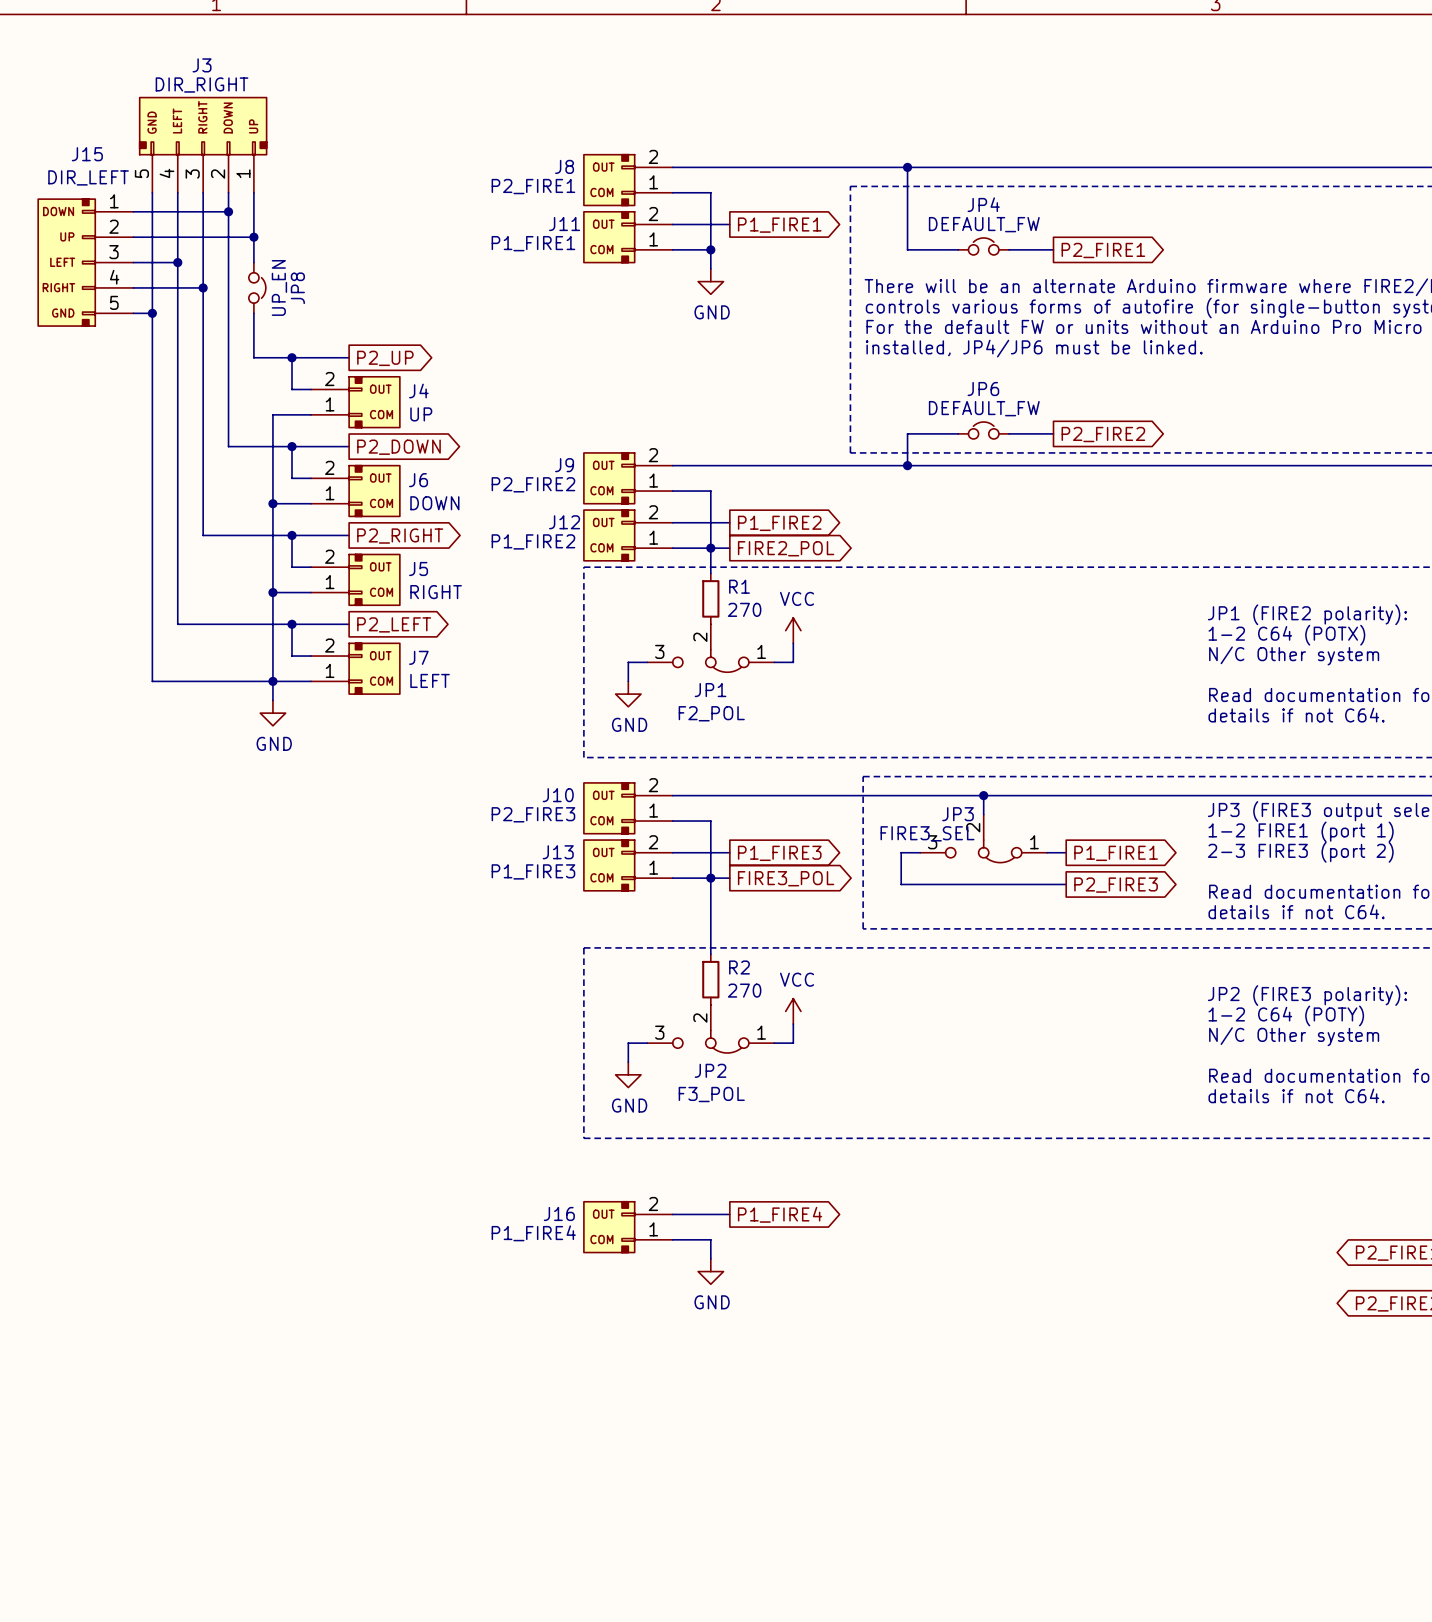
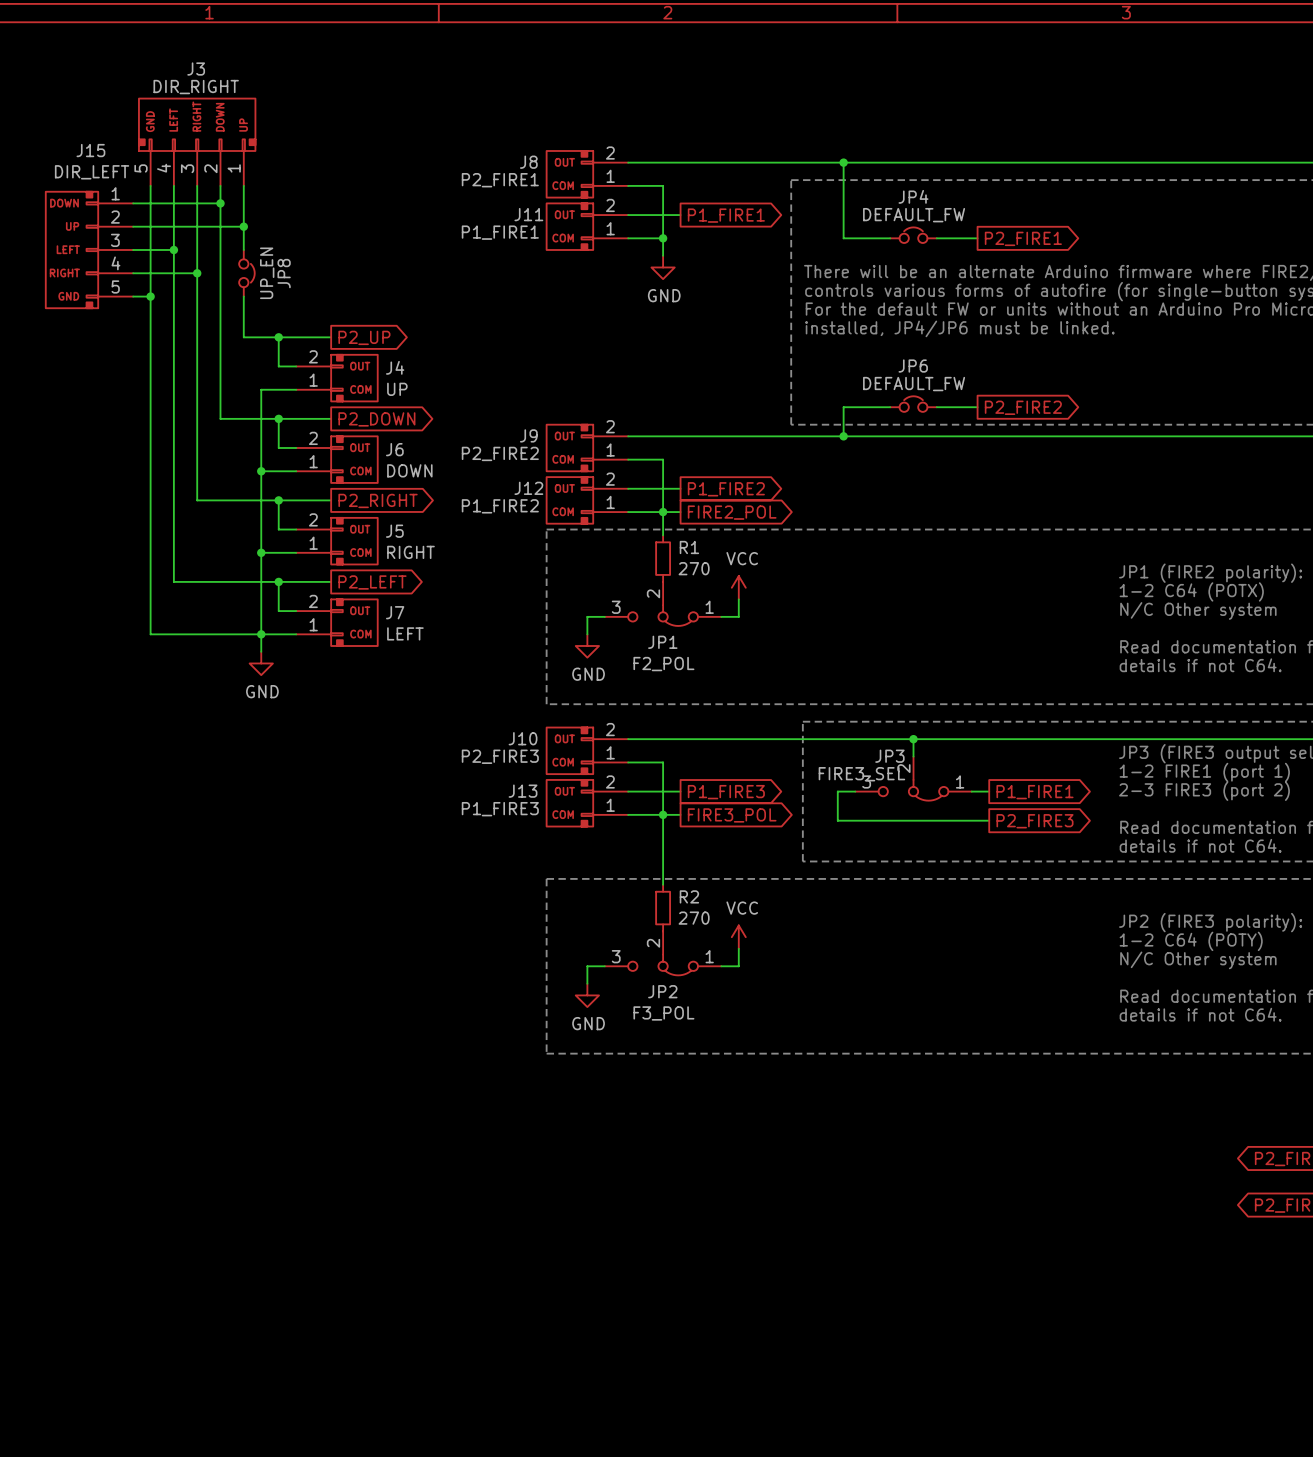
wire: (672, 1214) (729, 1214) -> none
global label: P1_FIRE4 (780, 1214) -> none
J16: P1_FIRE4 (628, 1227) -> none
wire: (672, 1239) (710, 1239) (710, 1258) -> none
power symbol: GND (710, 1271) -> none

